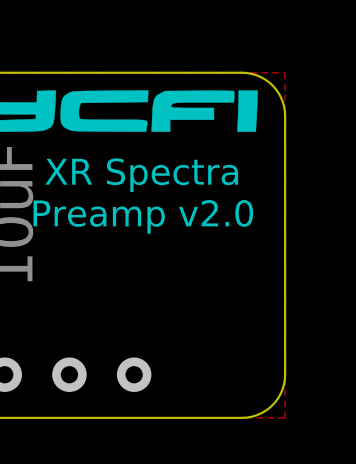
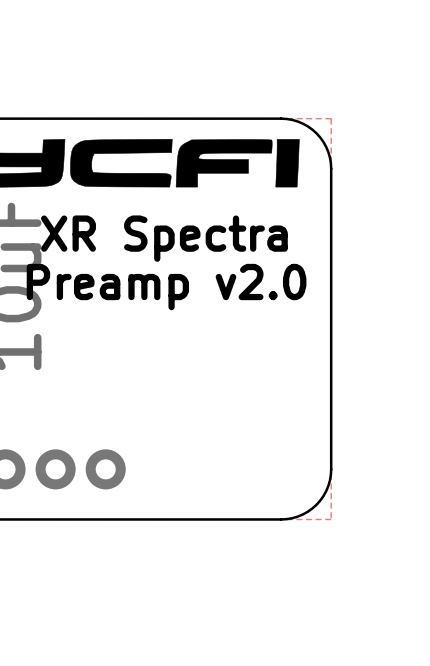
via: none -> (55, 469)
via: (69, 374) -> none
via: none -> (105, 469)
via: (134, 374) -> none

